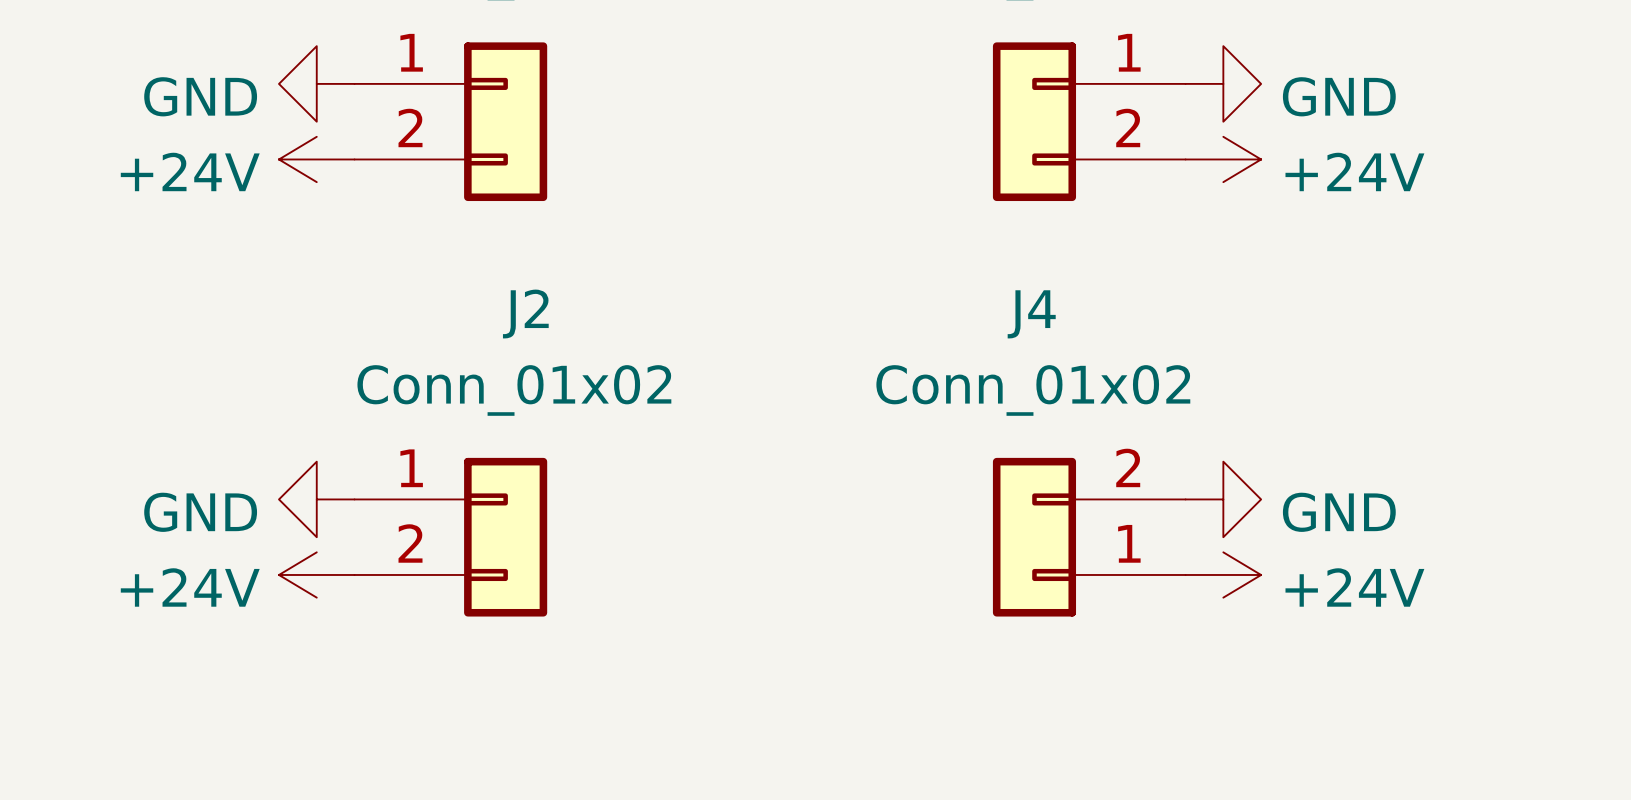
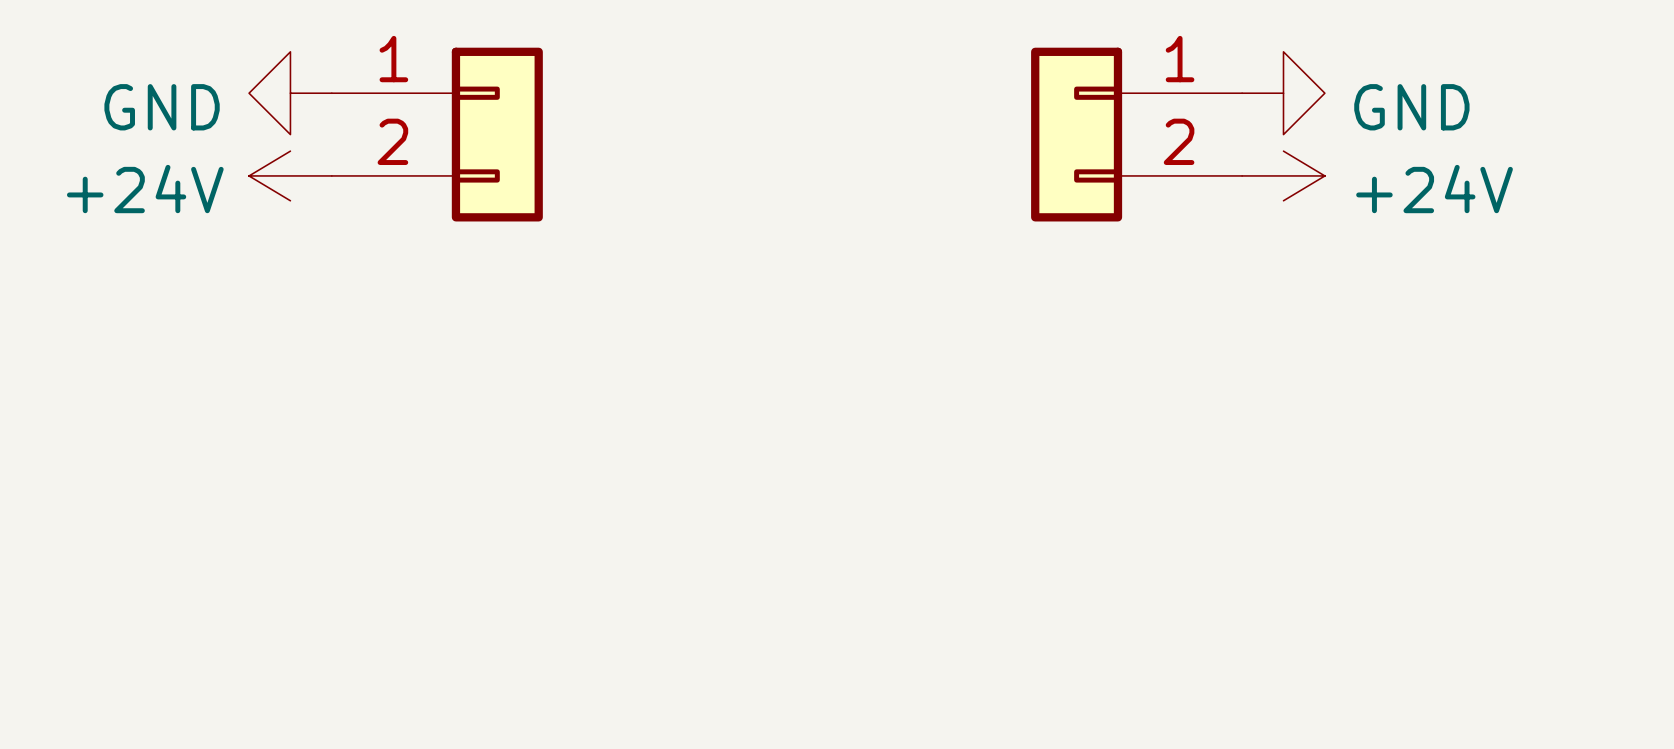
power symbol: GND (316, 499) -> none
power symbol: GND (1223, 499) -> none
J2: Conn_01x02 (450, 537) -> none
J4: Conn_01x02 (1089, 537) -> none
power symbol: +24V (316, 574) -> none
power symbol: +24V (1223, 574) -> none

